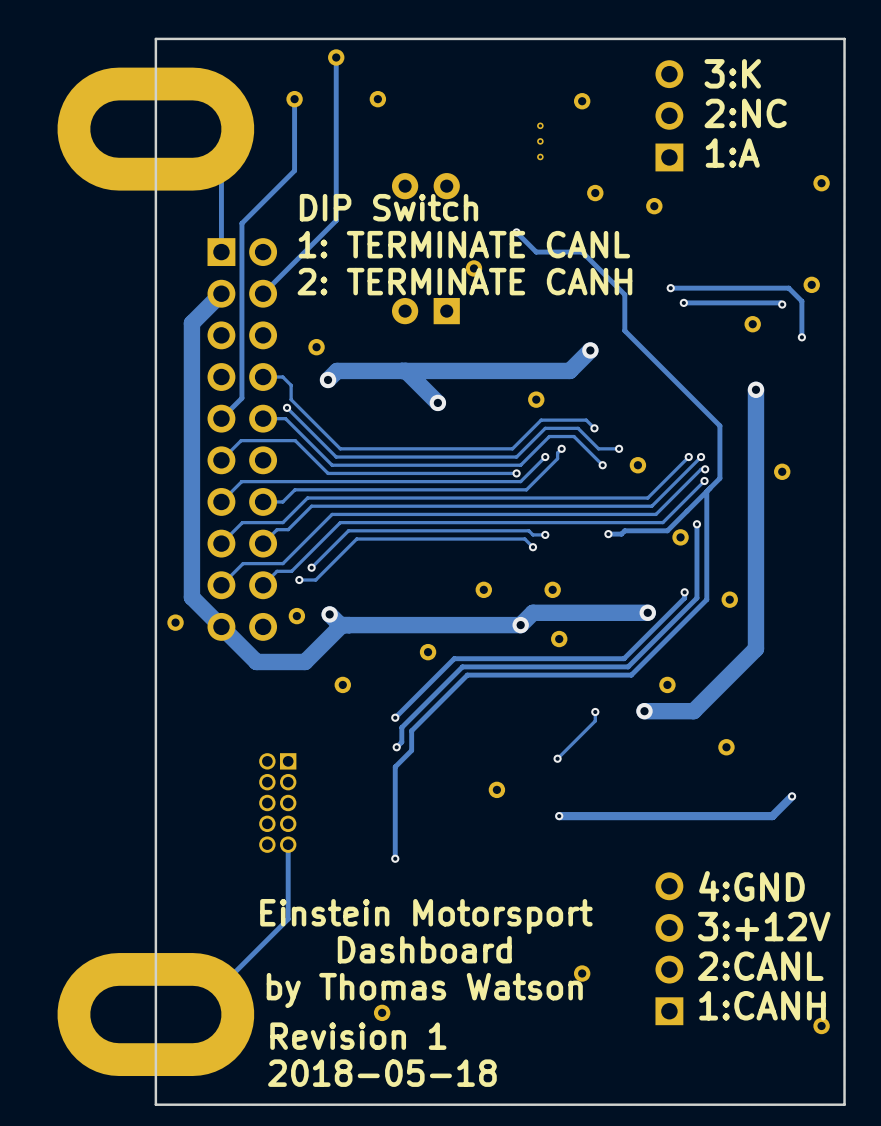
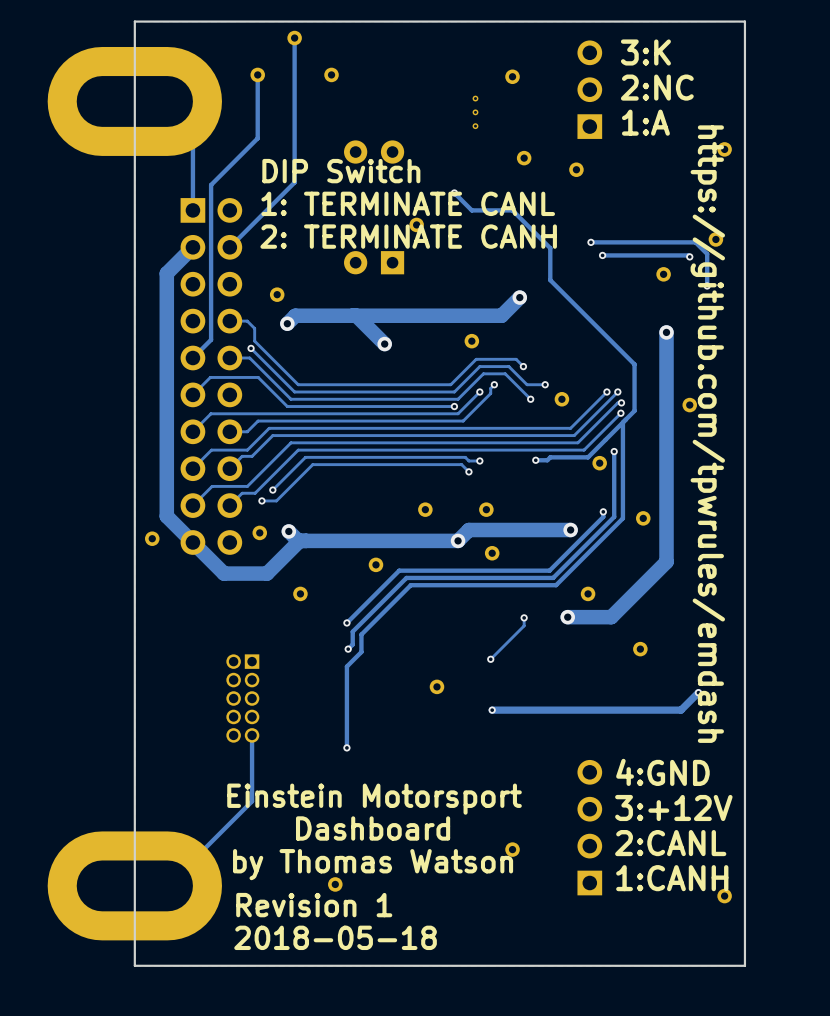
text: none -> https://github.com/tpwrules/emdash (707, 434)

